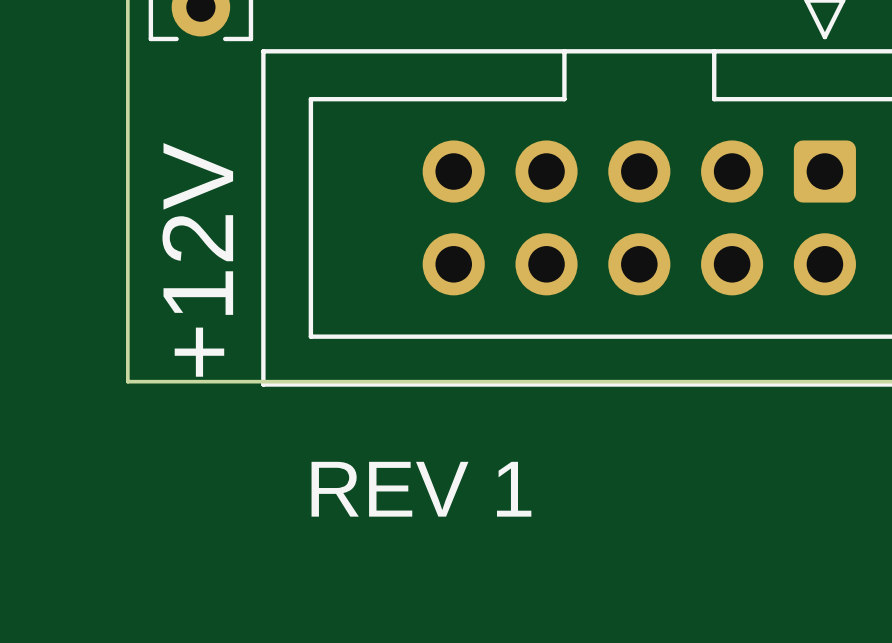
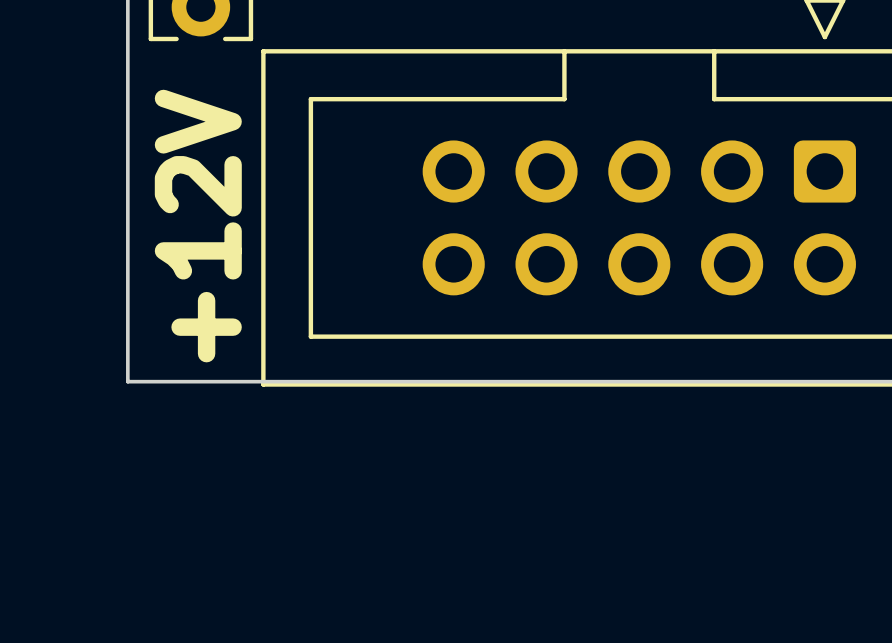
text: REV 1 (421, 489) -> none

